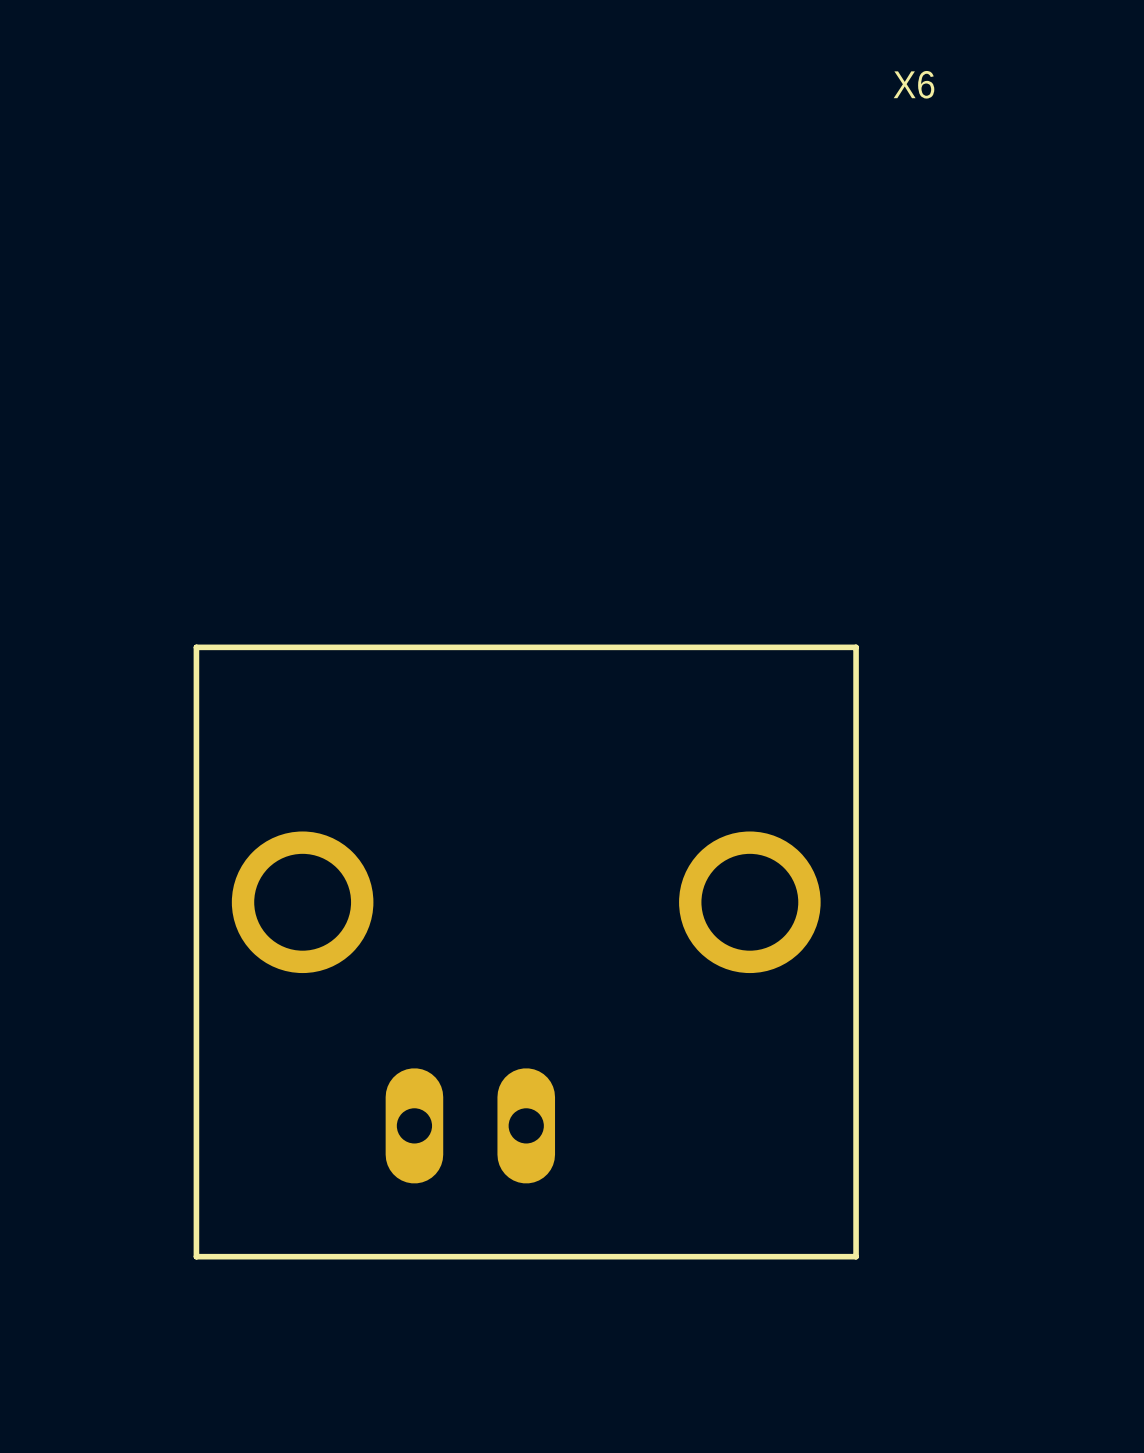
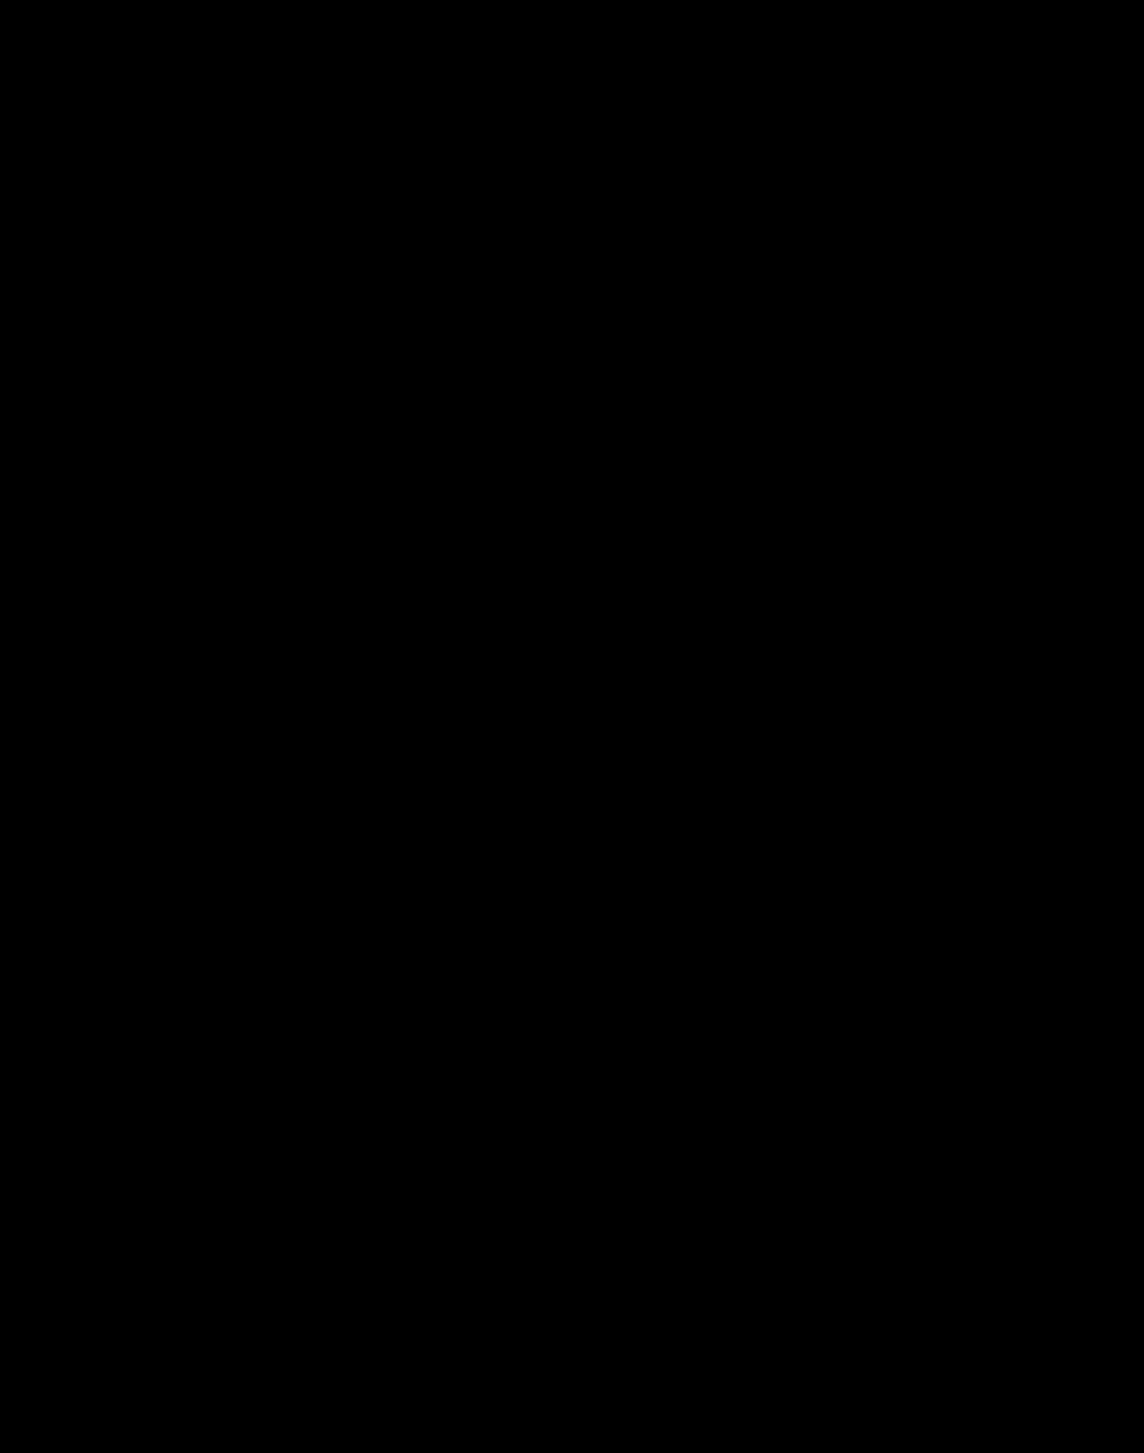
X6: (526, 952) -> none

